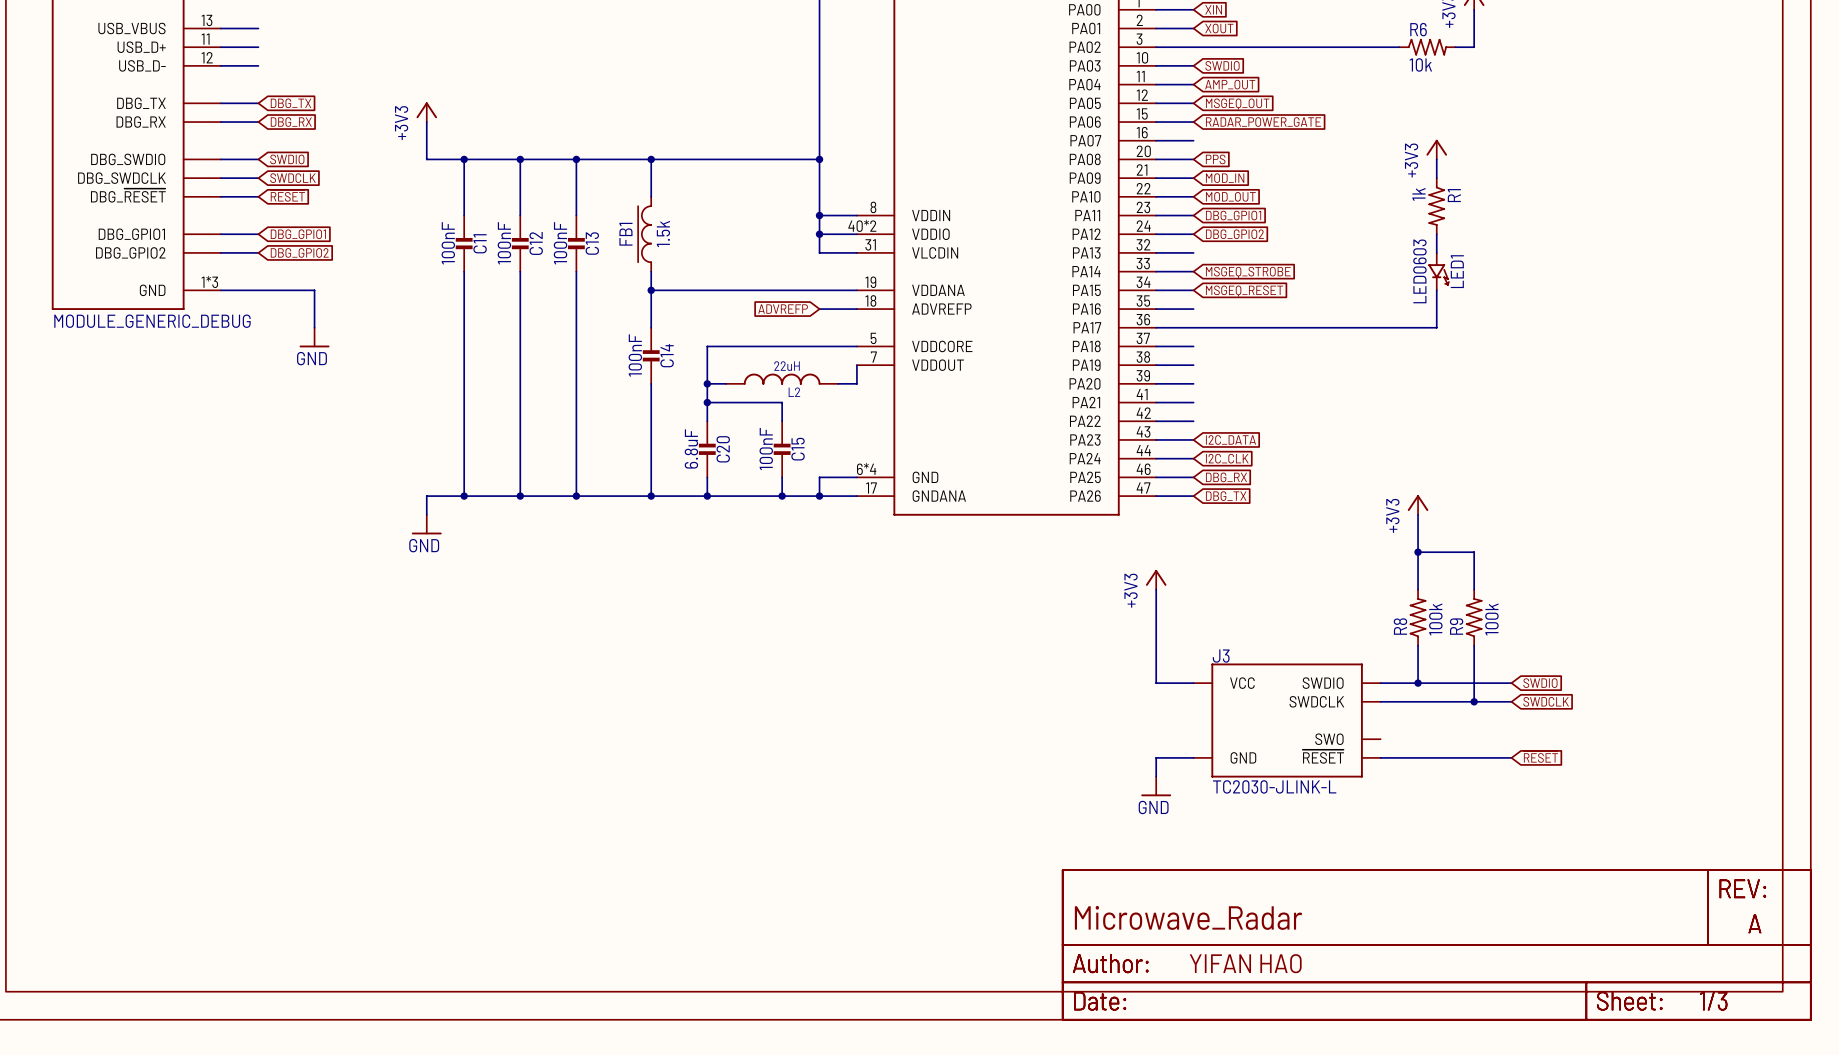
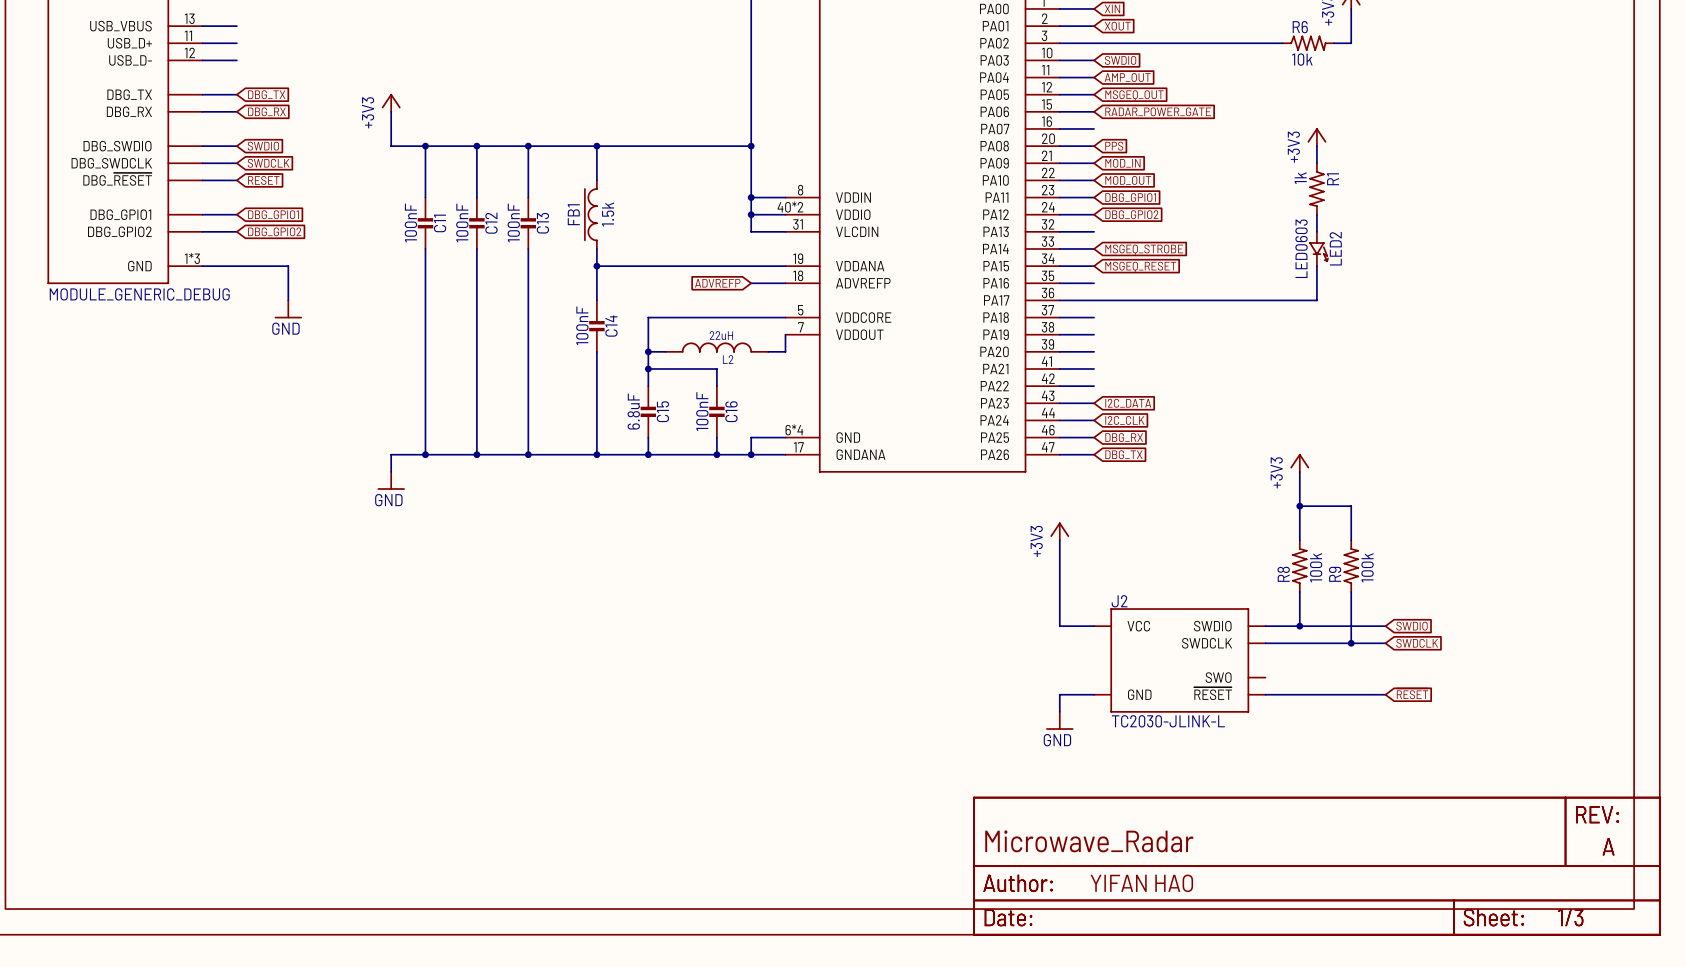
LED1 name: LED1 (1457, 271) -> LED2 (1335, 248)
C20 name: C20 (723, 449) -> C15 (662, 411)
C15 name: C15 (798, 449) -> C16 (731, 411)
J3 name: J3 (1221, 656) -> J2 (1119, 601)

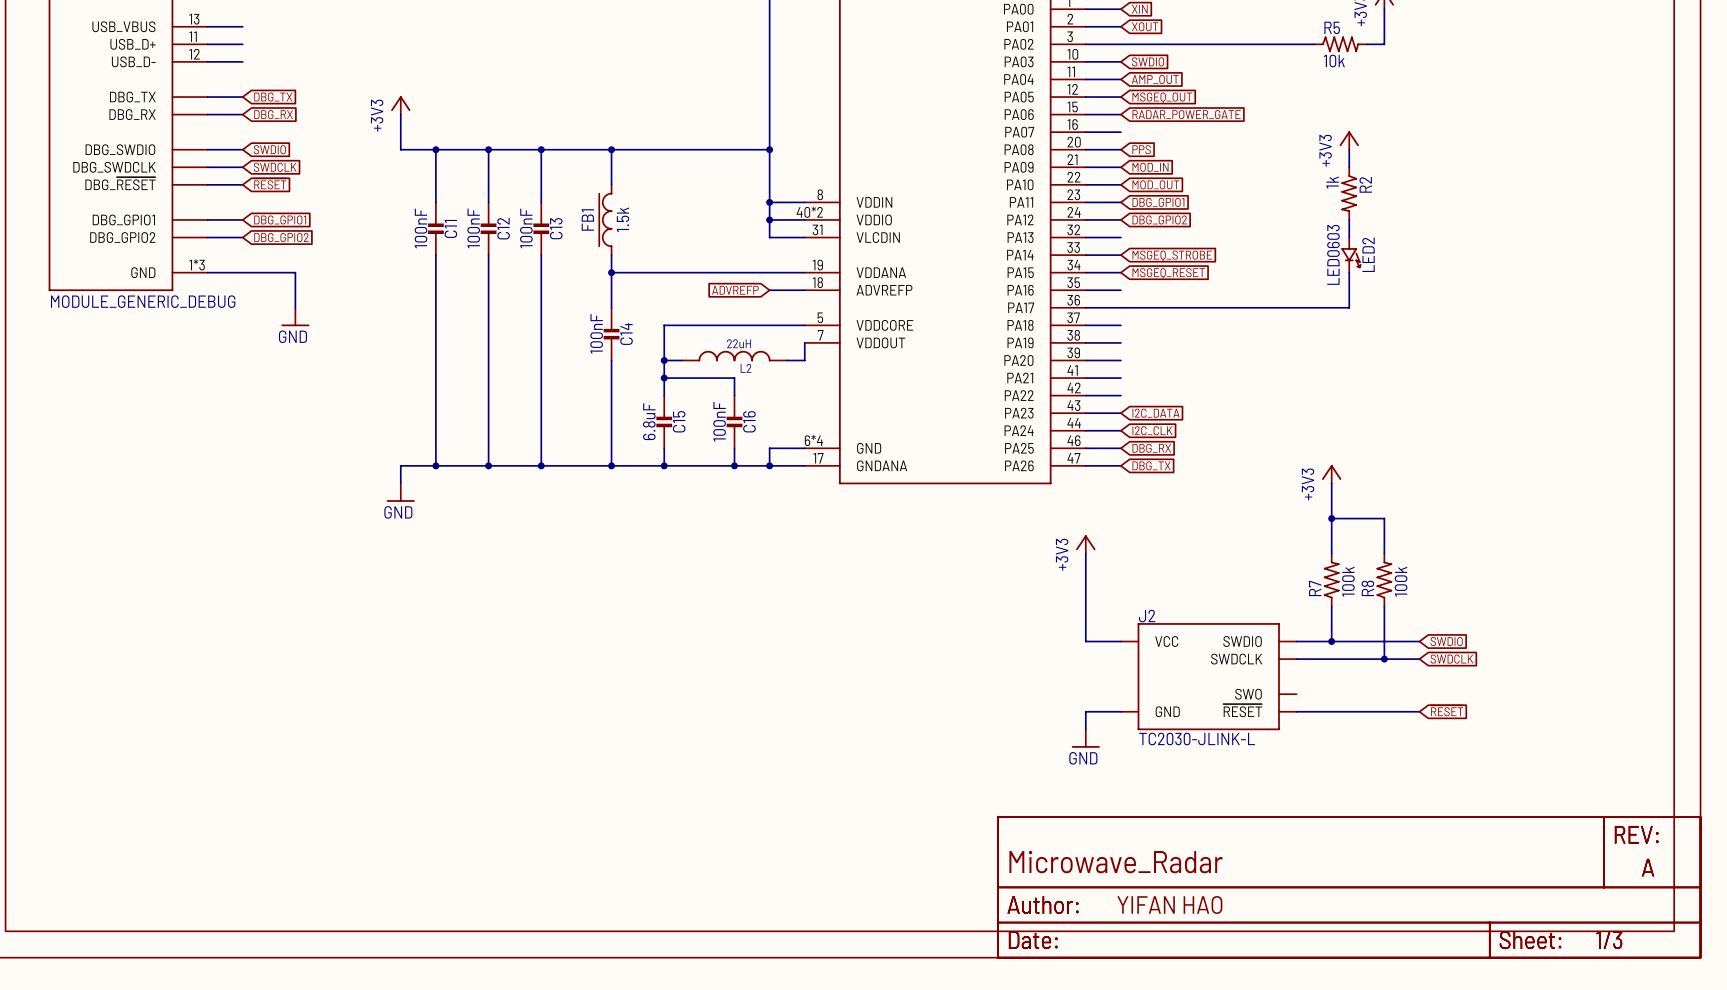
R6 name: R6 (1300, 27) -> R5 (1332, 27)
R1 name: R1 (1333, 179) -> R2 (1365, 184)
R8 name: R8 (1283, 574) -> R7 (1315, 588)
R9 name: R9 (1335, 574) -> R8 (1367, 588)

